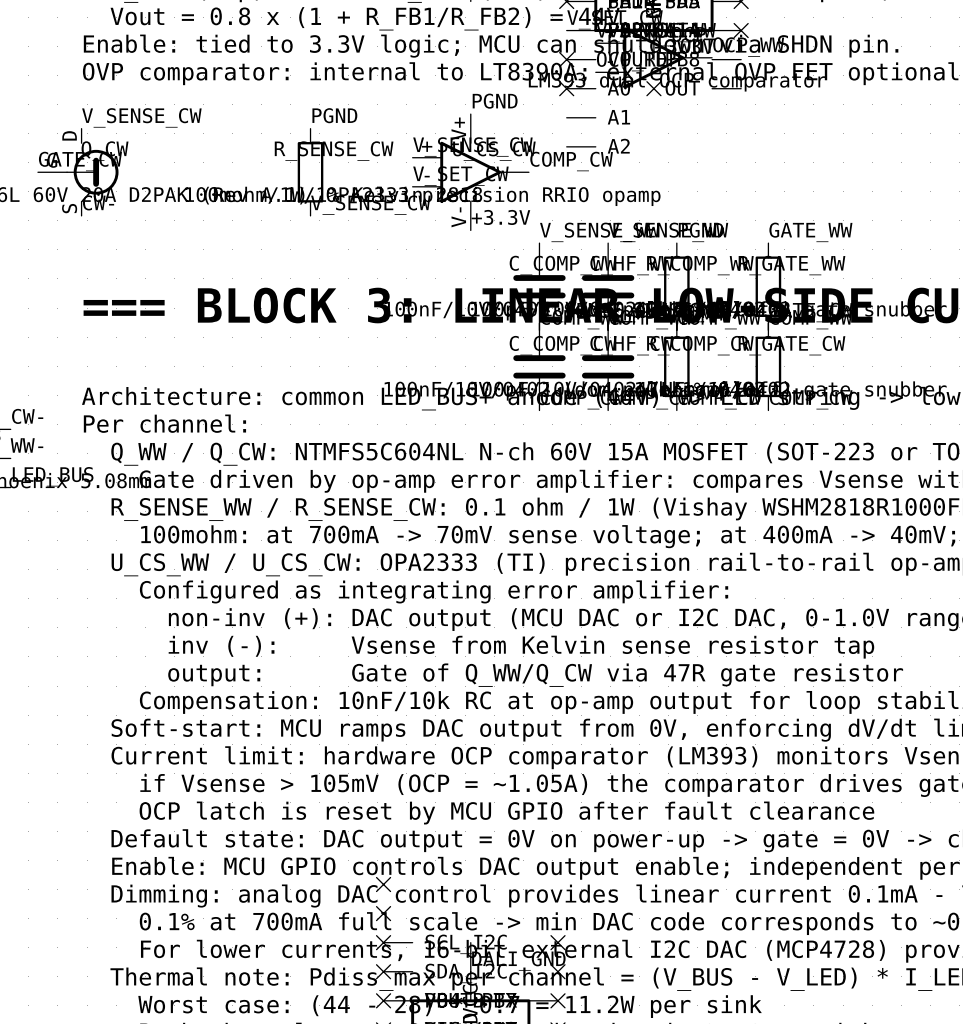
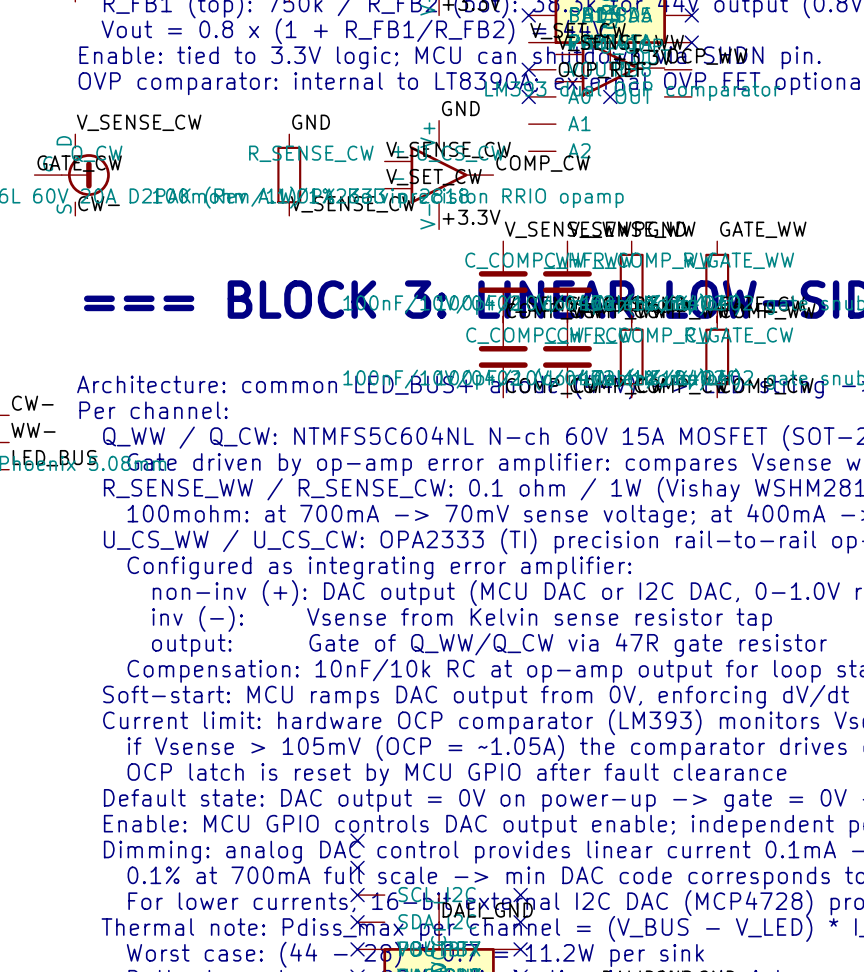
label: PGND (495, 101) -> GND (460, 108)
label: PGND (334, 115) -> GND (311, 122)

